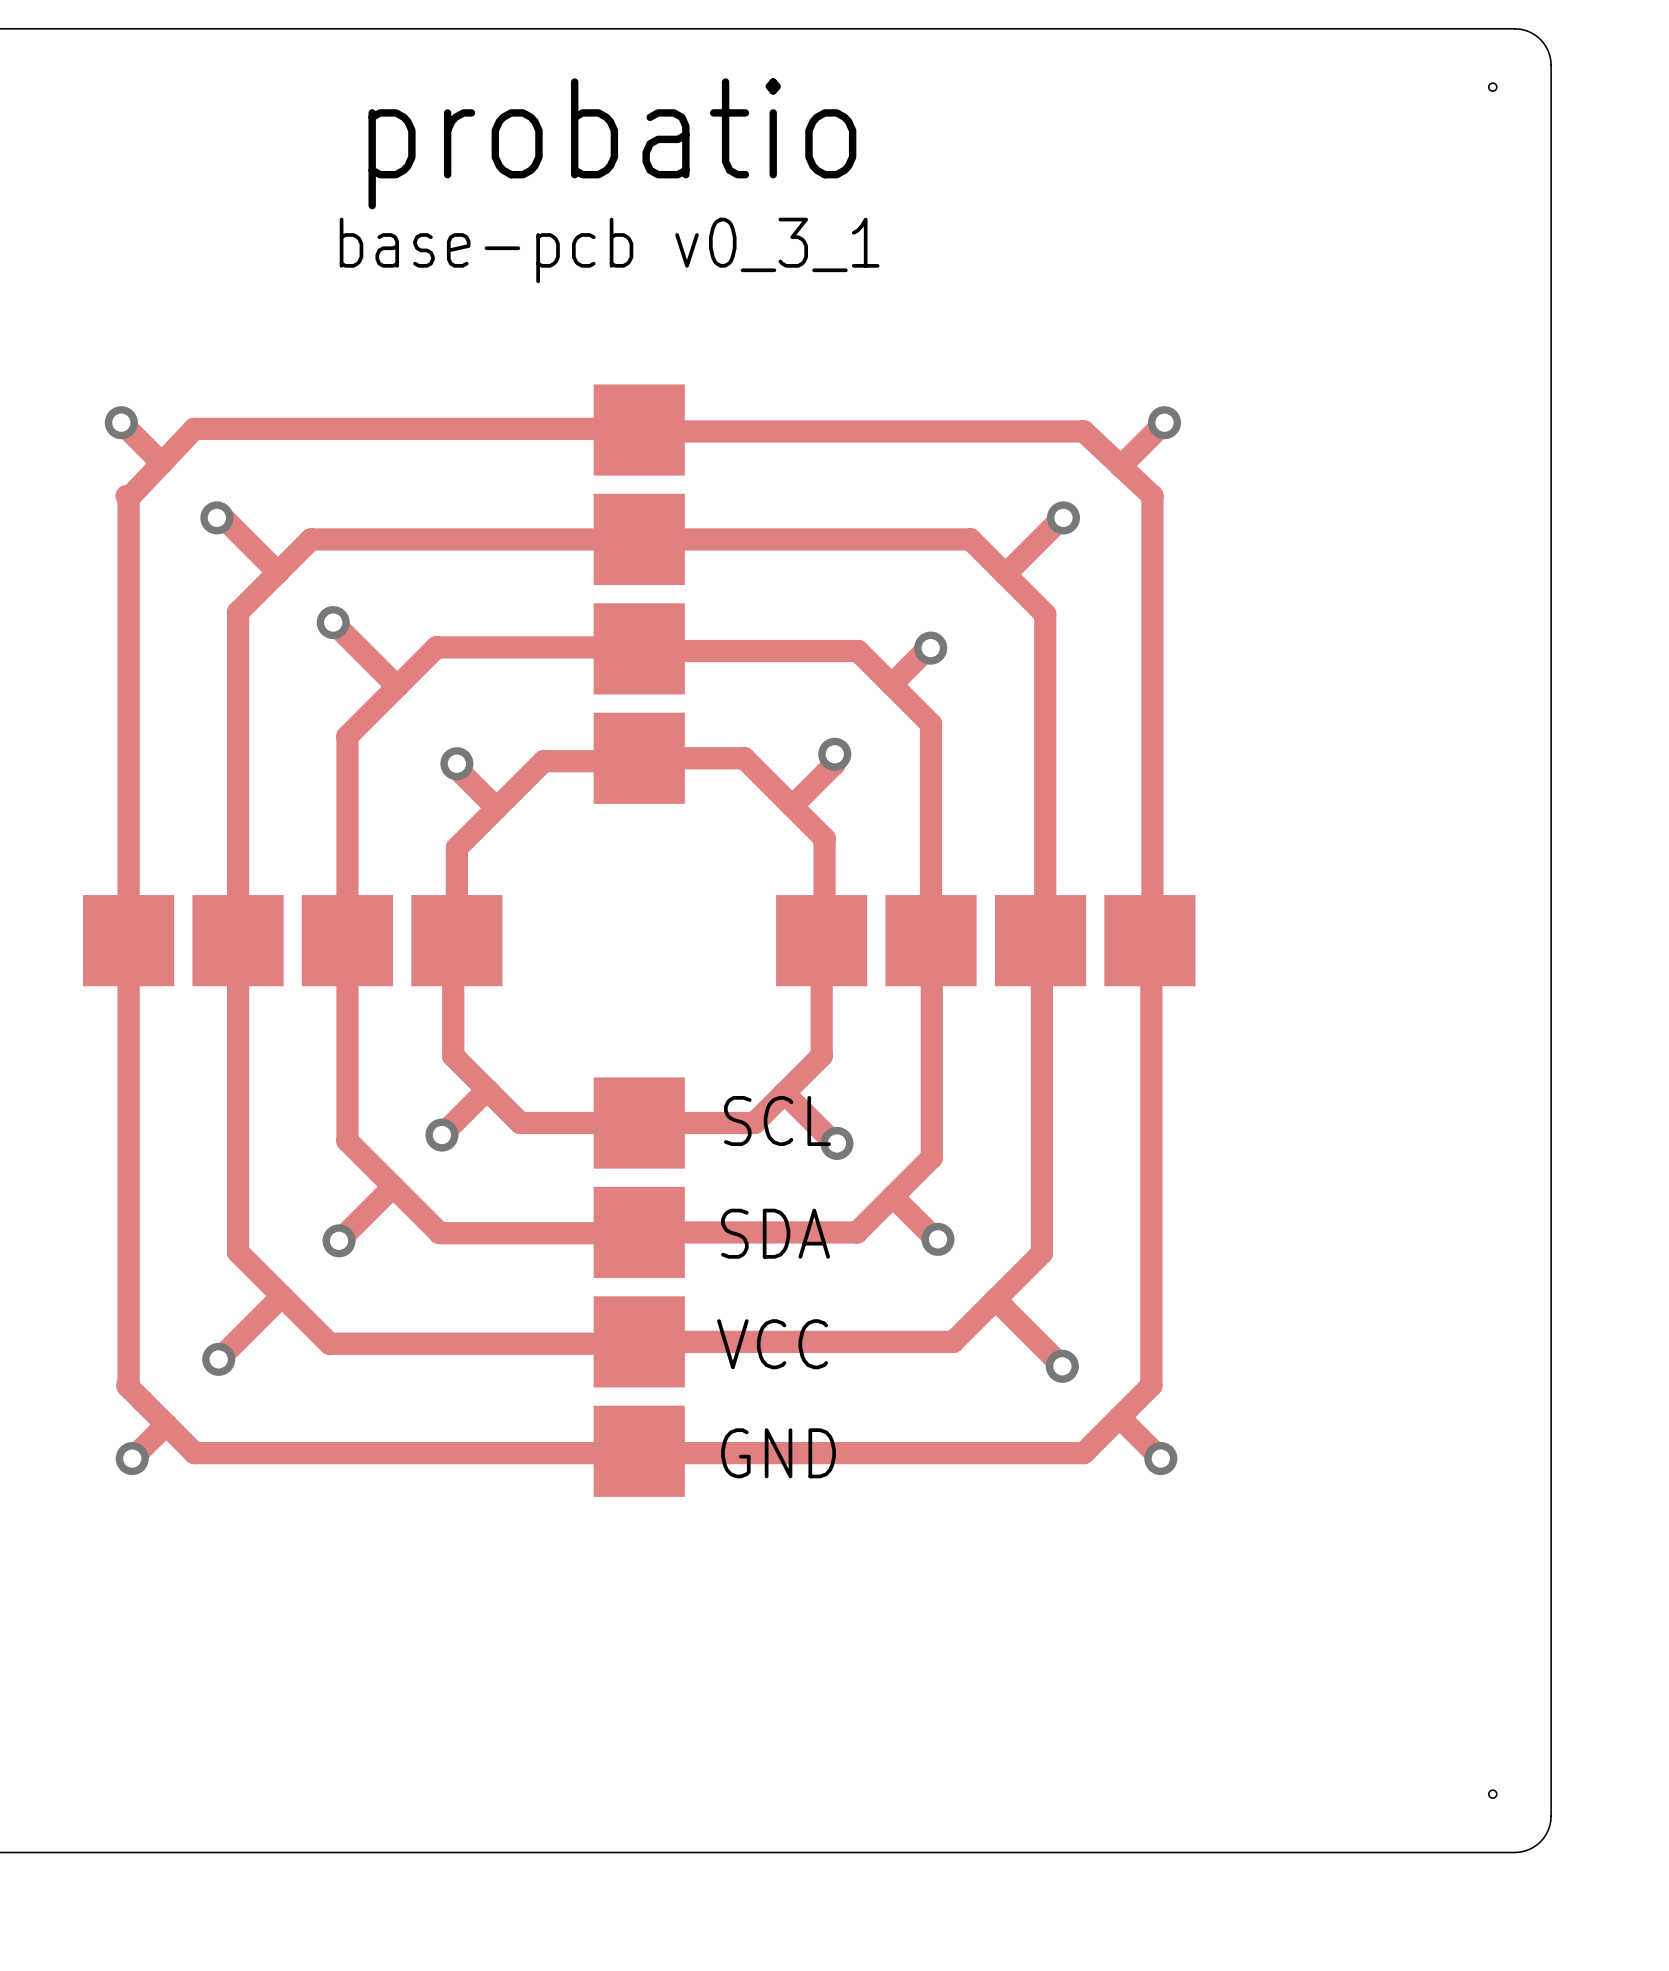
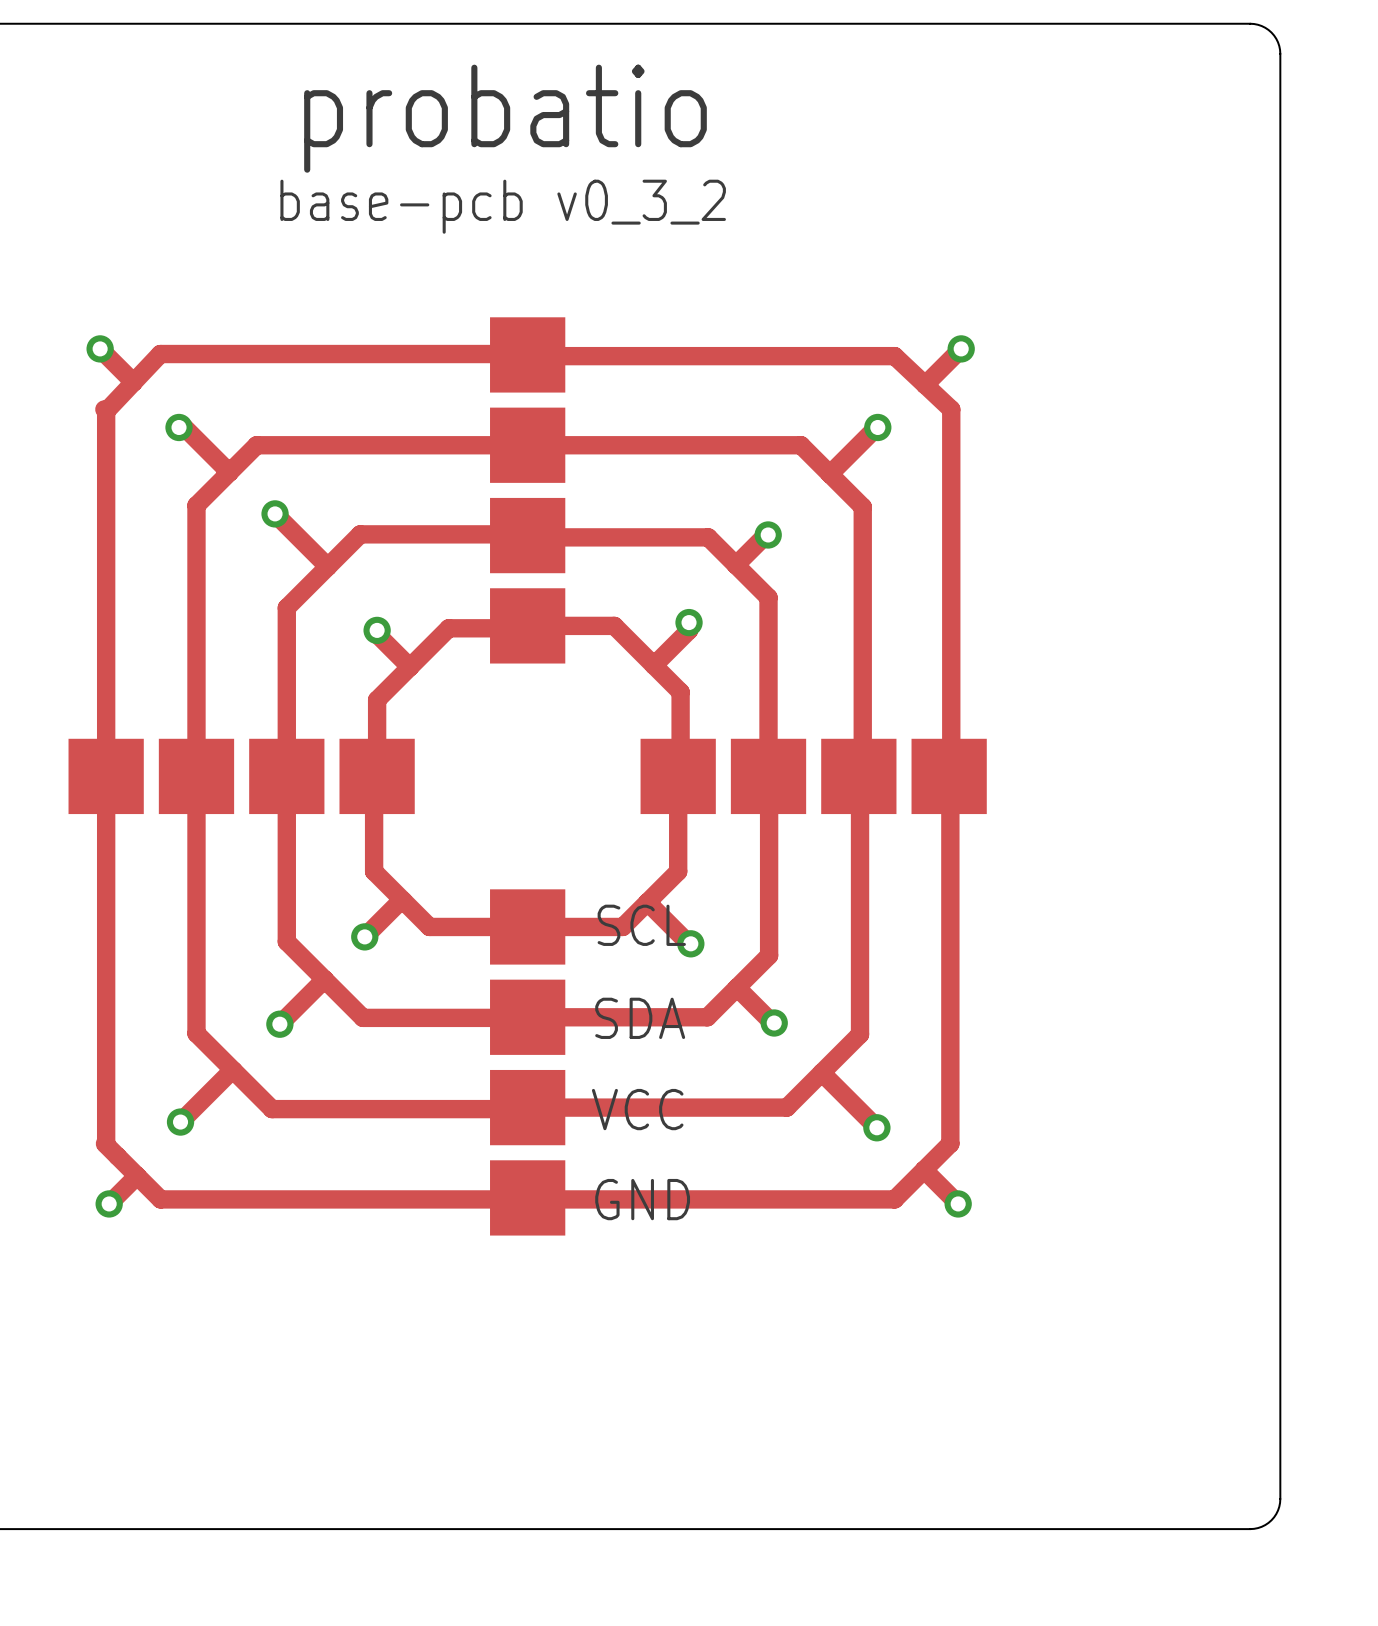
hole: (1492, 87) -> none
text: base-pcb v0_3_1 (609, 250) -> base-pcb v0_3_2 (503, 206)
hole: (1492, 1794) -> none

